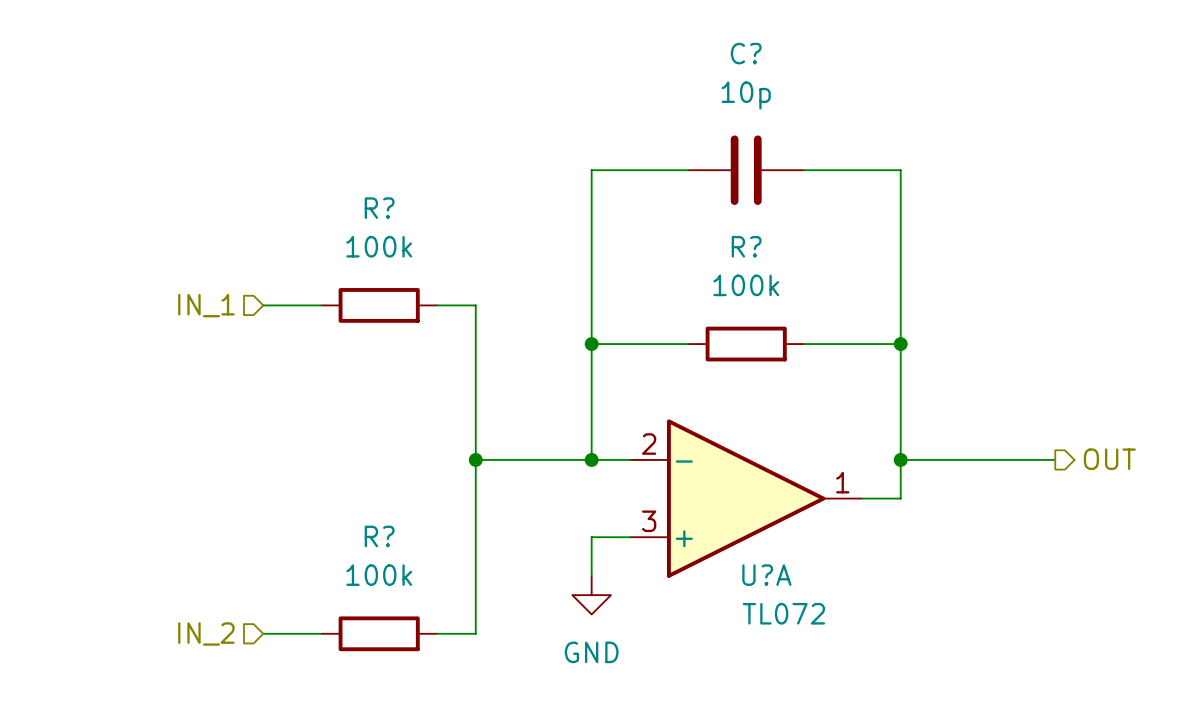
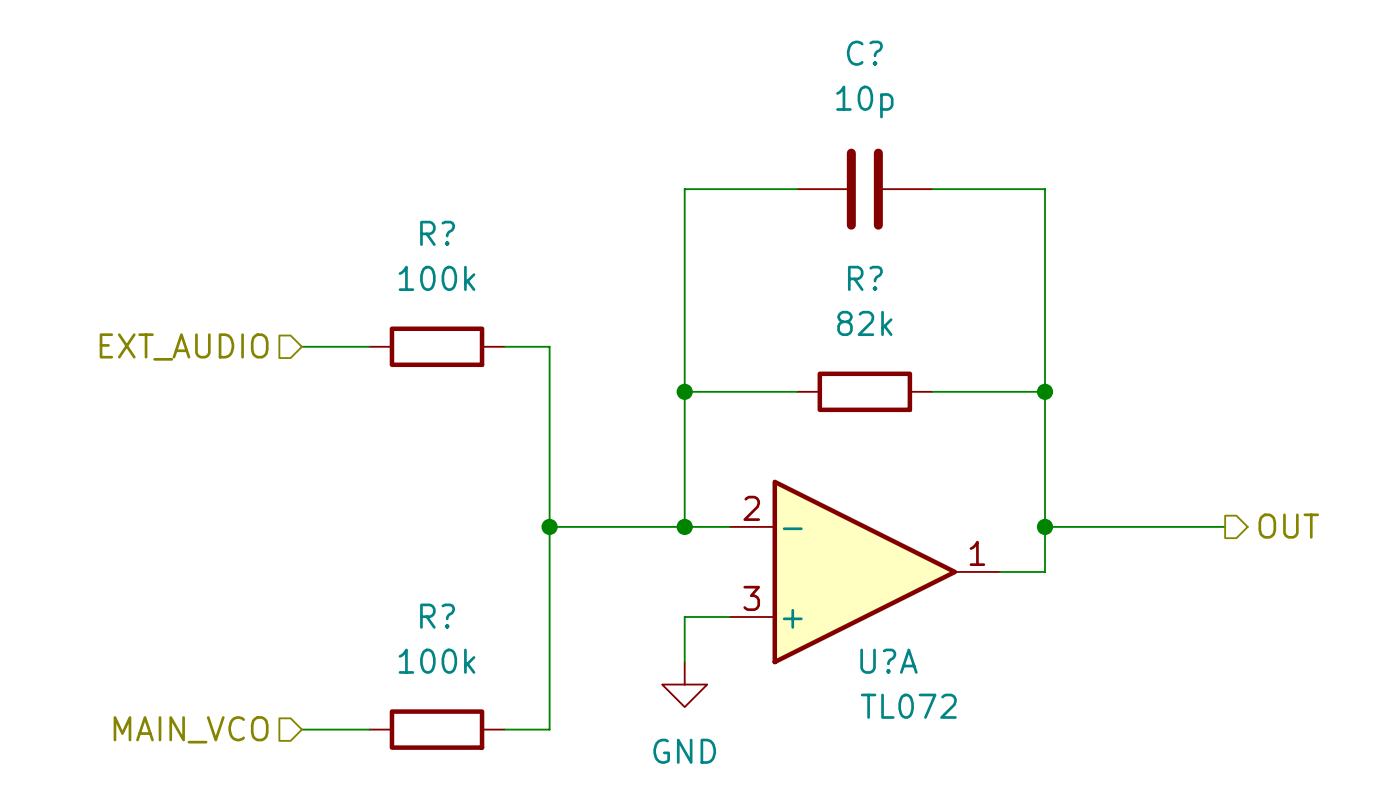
R? value: 100k (746, 285) -> 82k (864, 323)
hierarchical label: IN_1 (206, 305) -> EXT_AUDIO (184, 347)
hierarchical label: IN_2 (206, 633) -> MAIN_VCO (191, 729)

